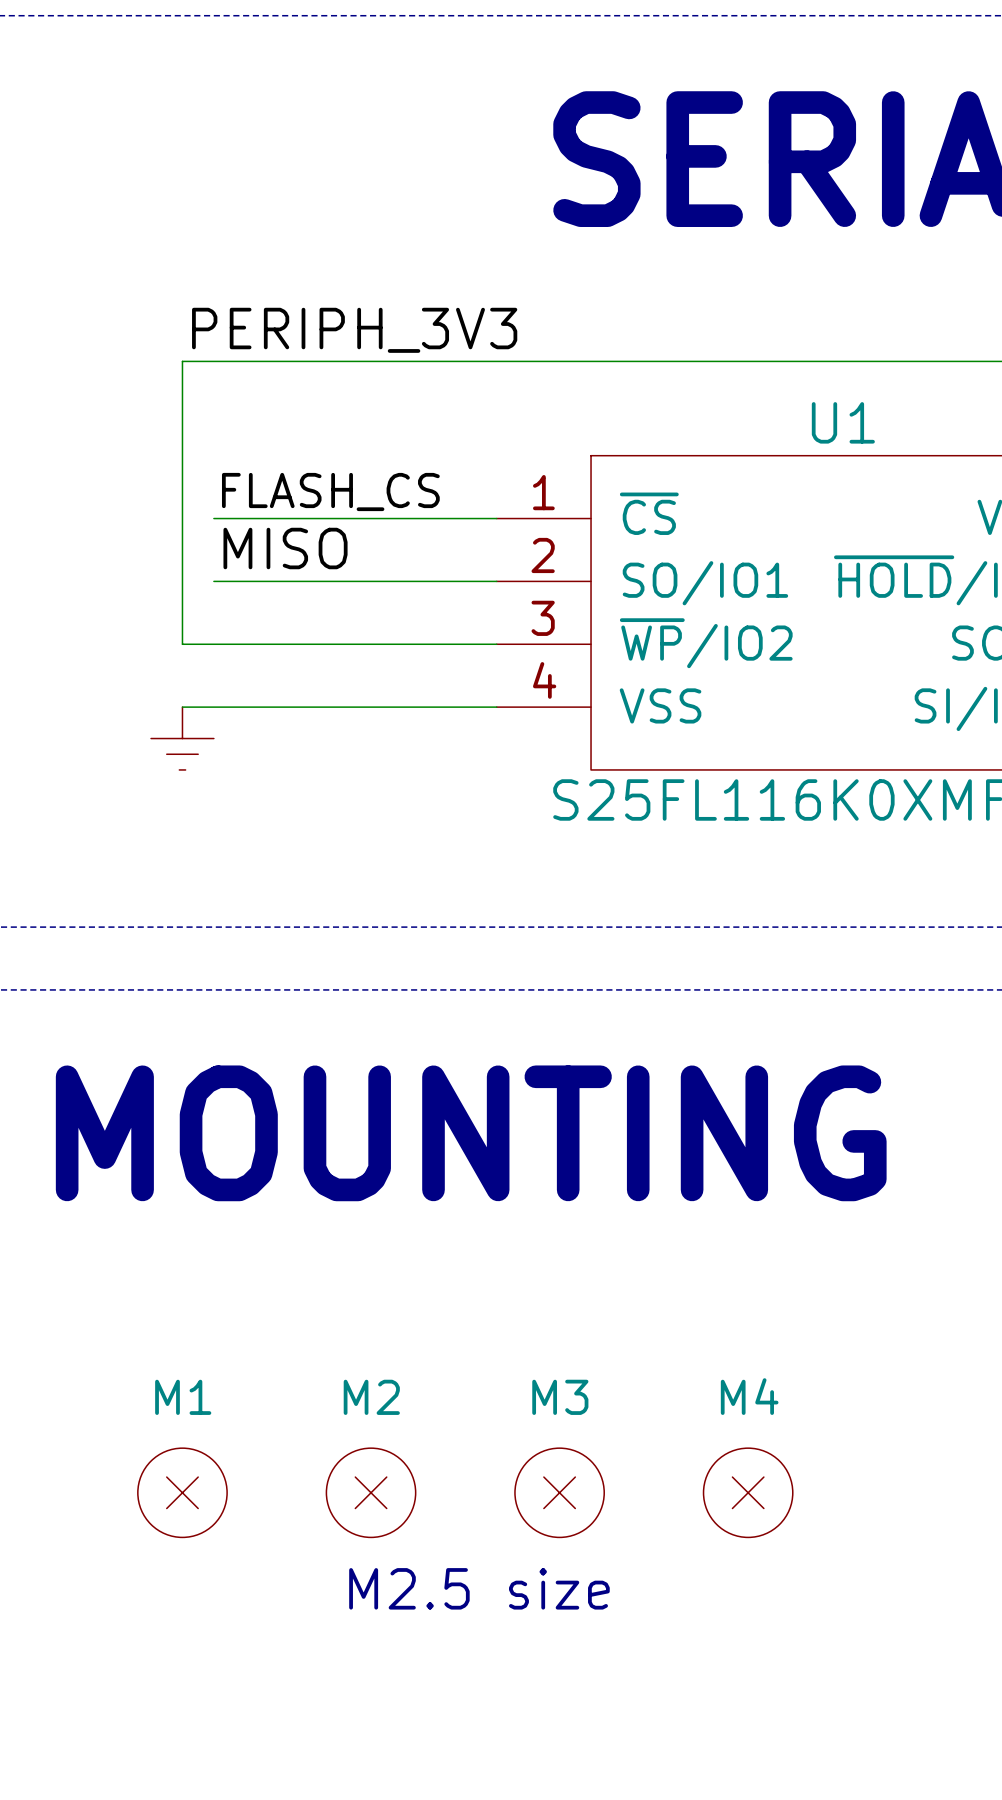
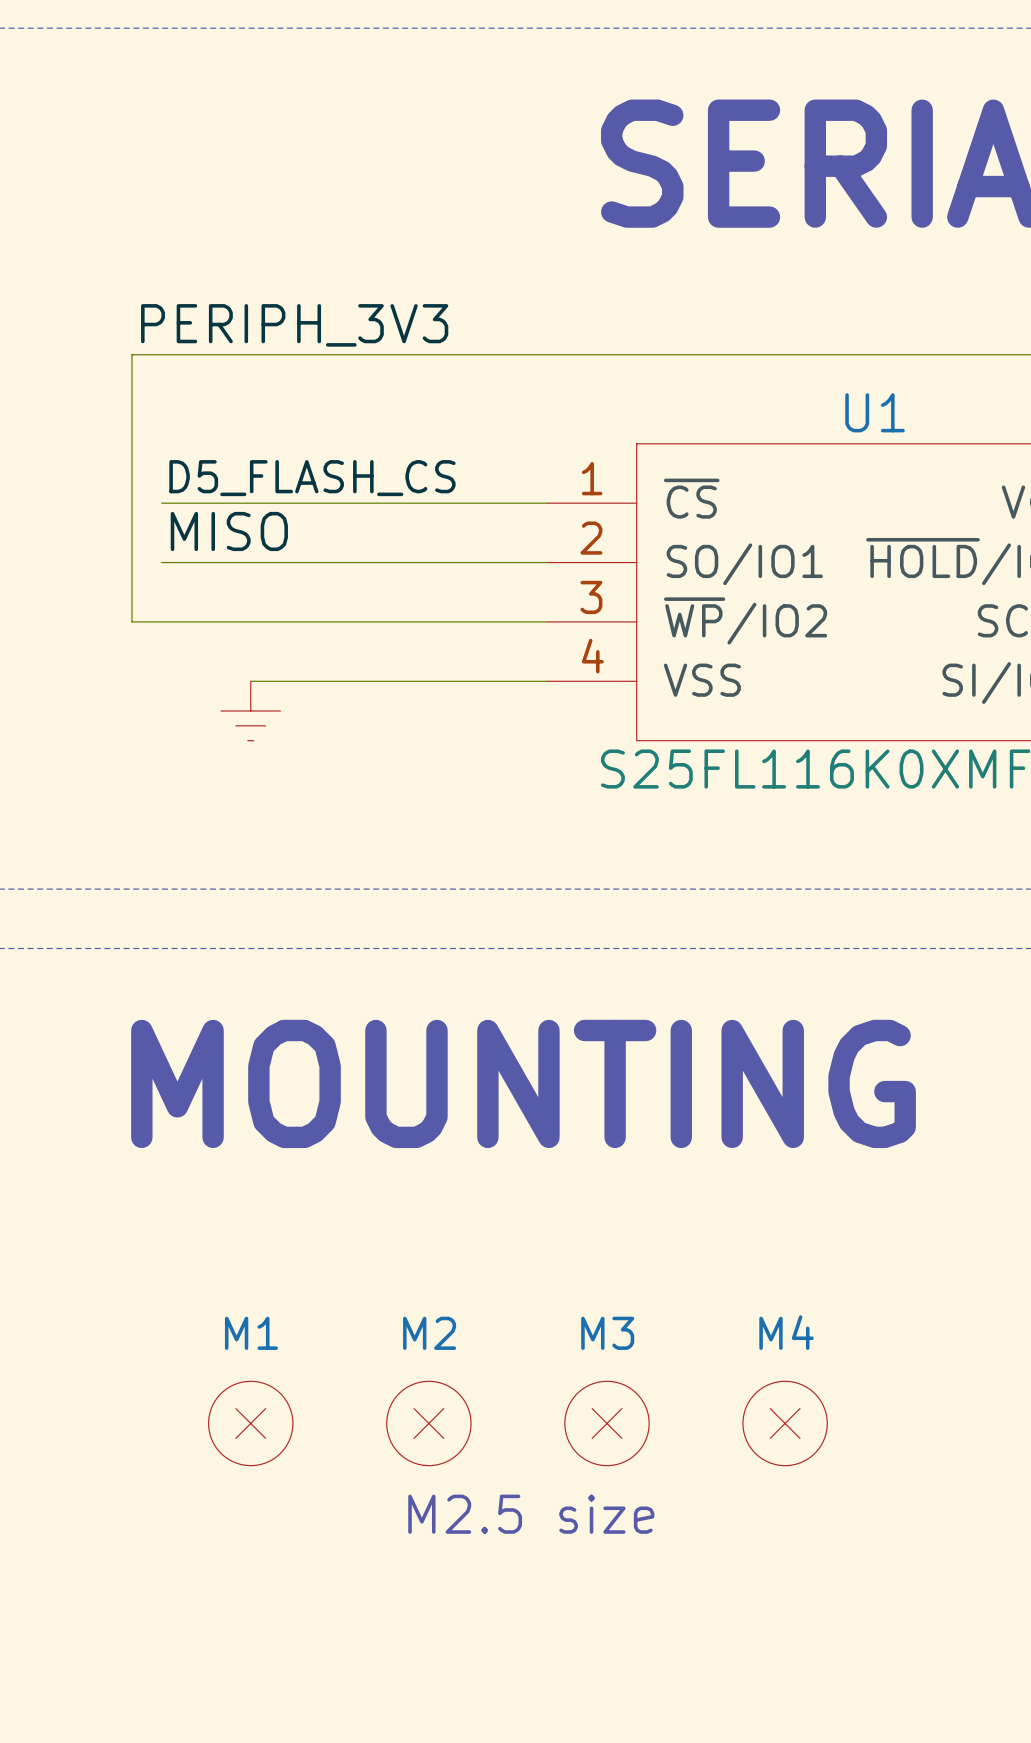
label position: PERIPH_3V3 (354, 330) -> PERIPH_3V3 (294, 325)
wire: (182, 361) (182, 644) -> (250, 354) (132, 354) (132, 621) (250, 621)
label: FLASH_CS (330, 492) -> D5_FLASH_CS (312, 478)
wire: none -> (161, 503) (280, 503)
label position: MISO (285, 548) -> MISO (229, 531)
wire: none -> (161, 562) (280, 562)

